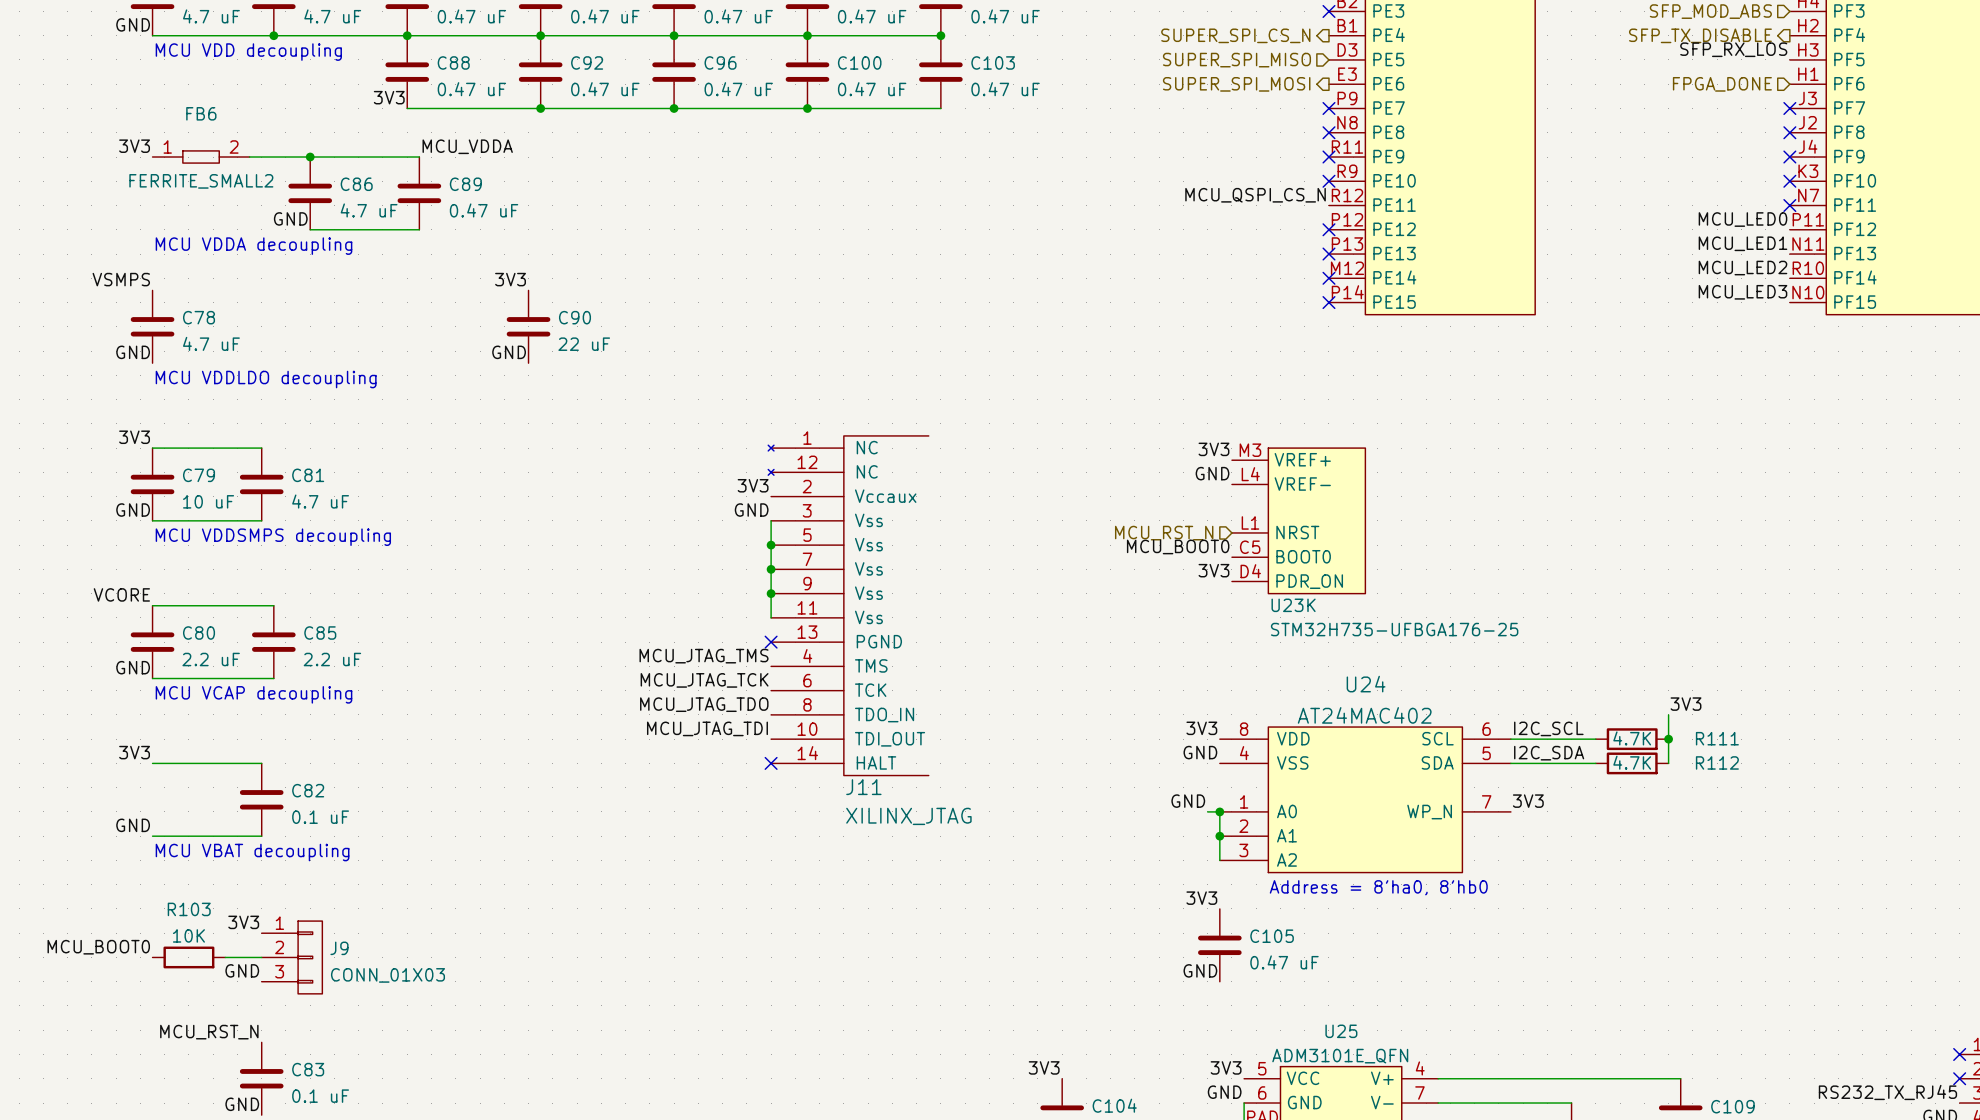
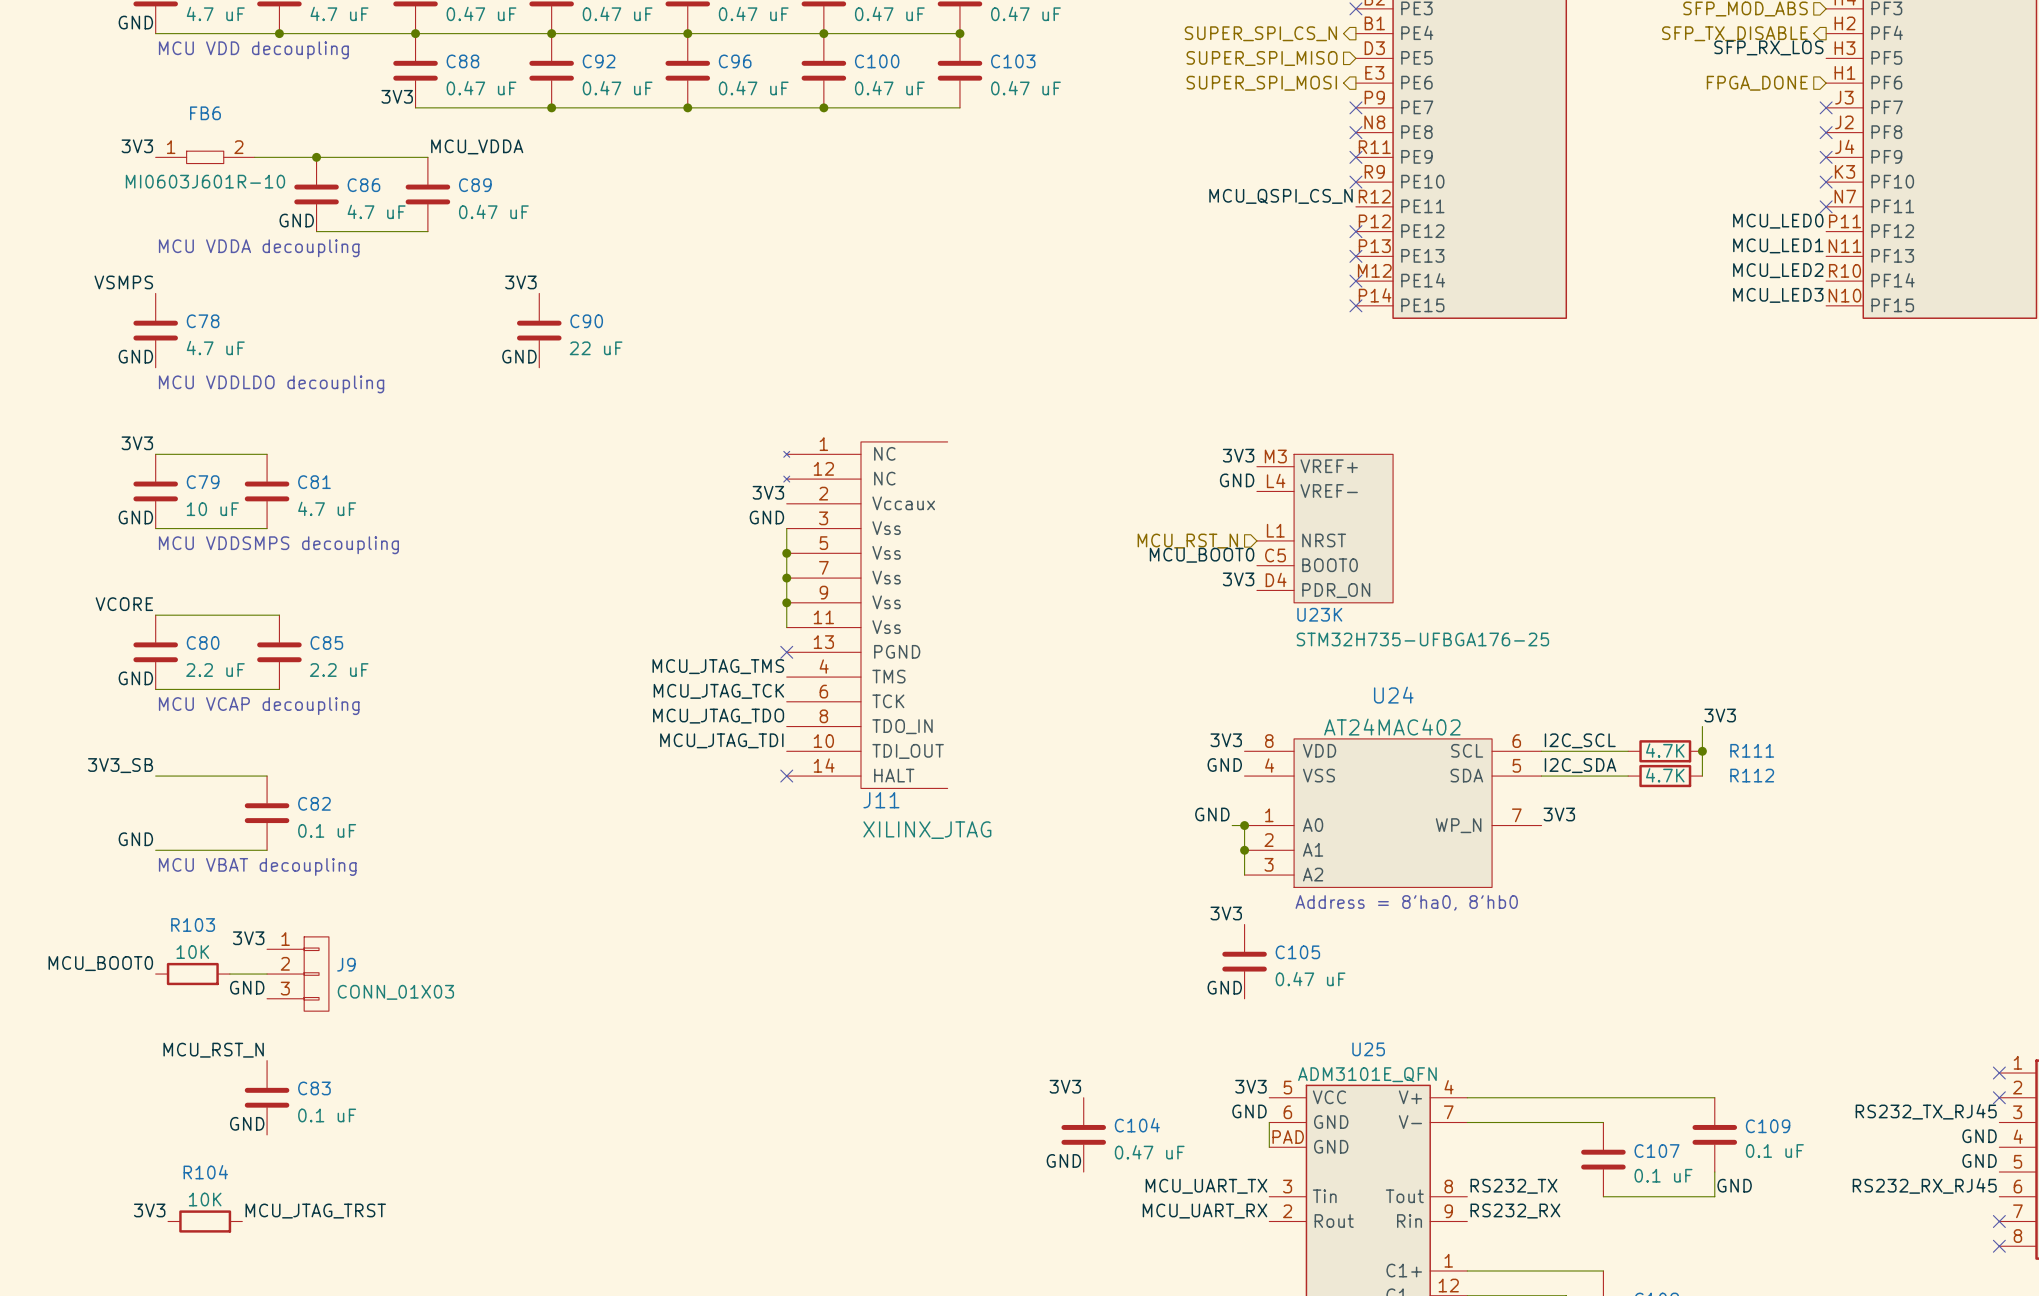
FB6 value: FERRITE_SMALL2 (201, 181) -> MI0603J601R-10 (205, 181)
label: 3V3 (134, 752) -> 3V3_SB (120, 765)

